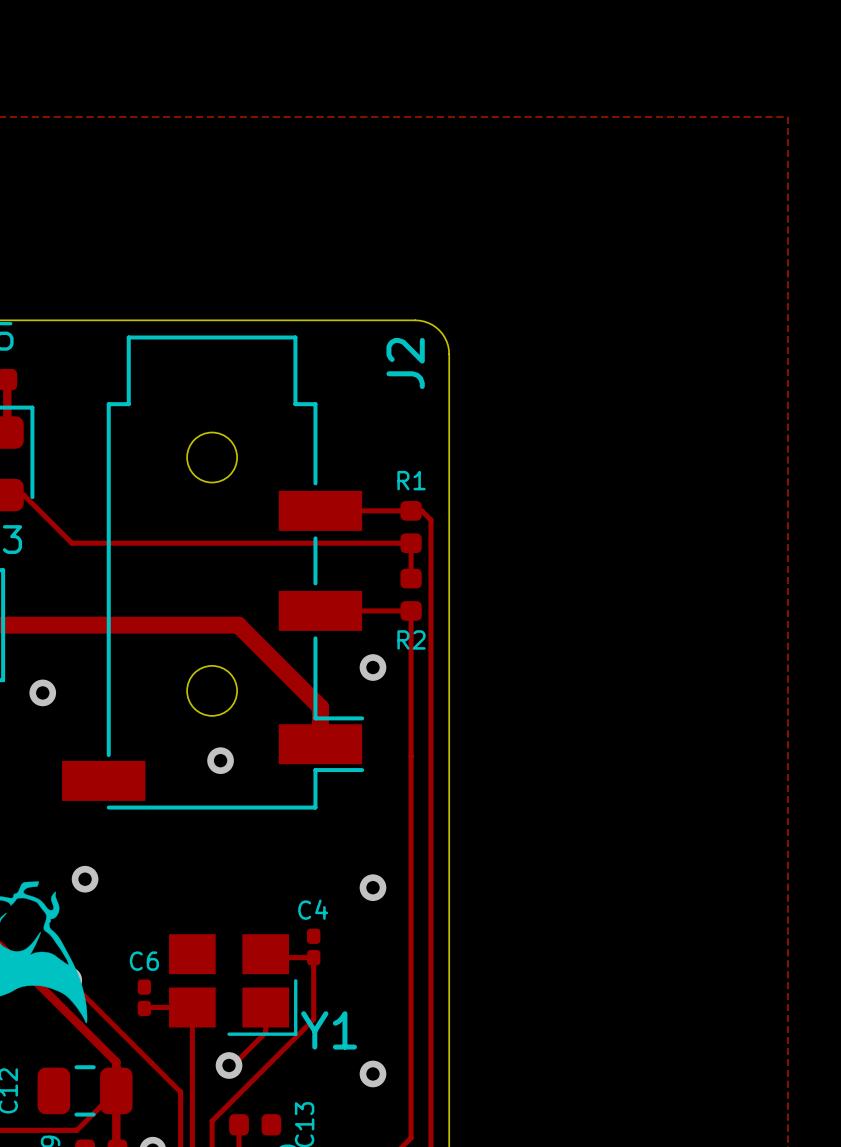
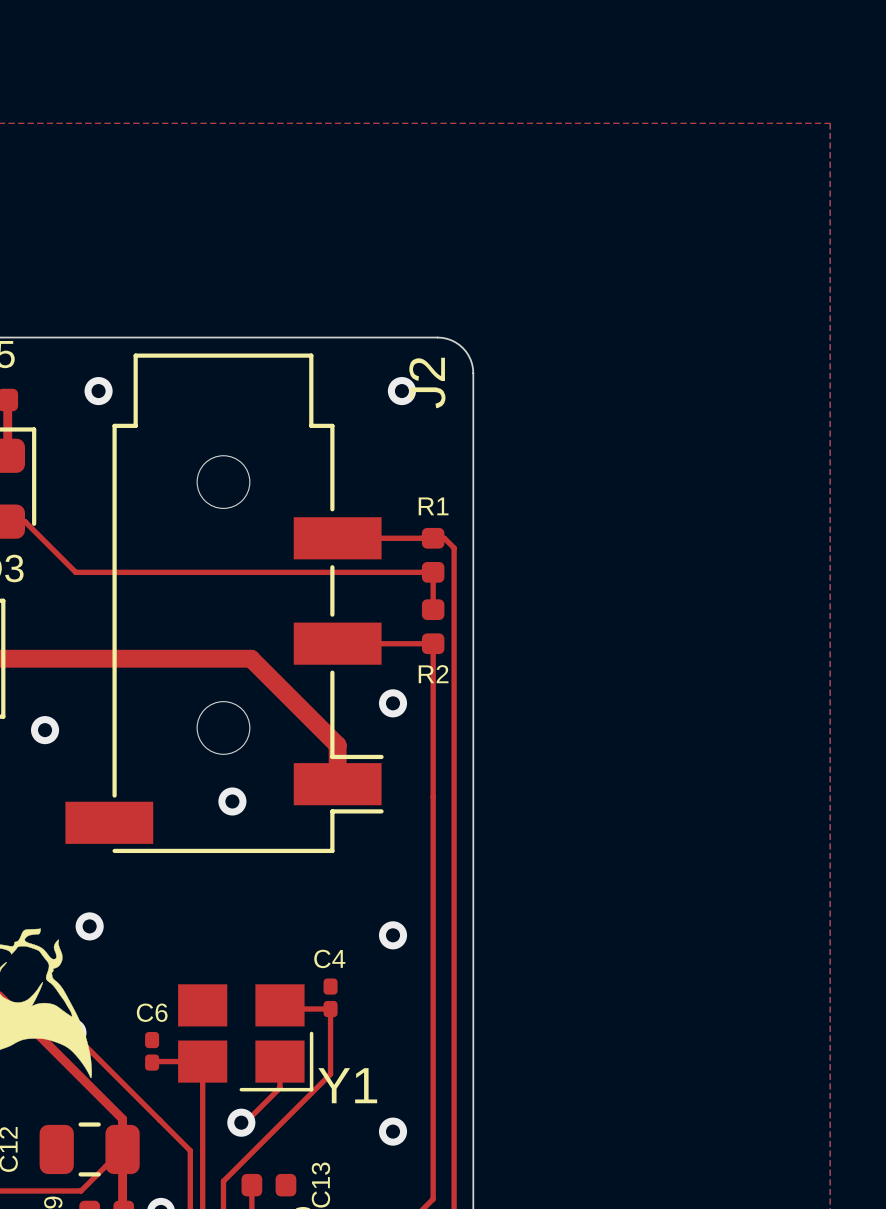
via: none -> (98, 391)
via: none -> (401, 391)

